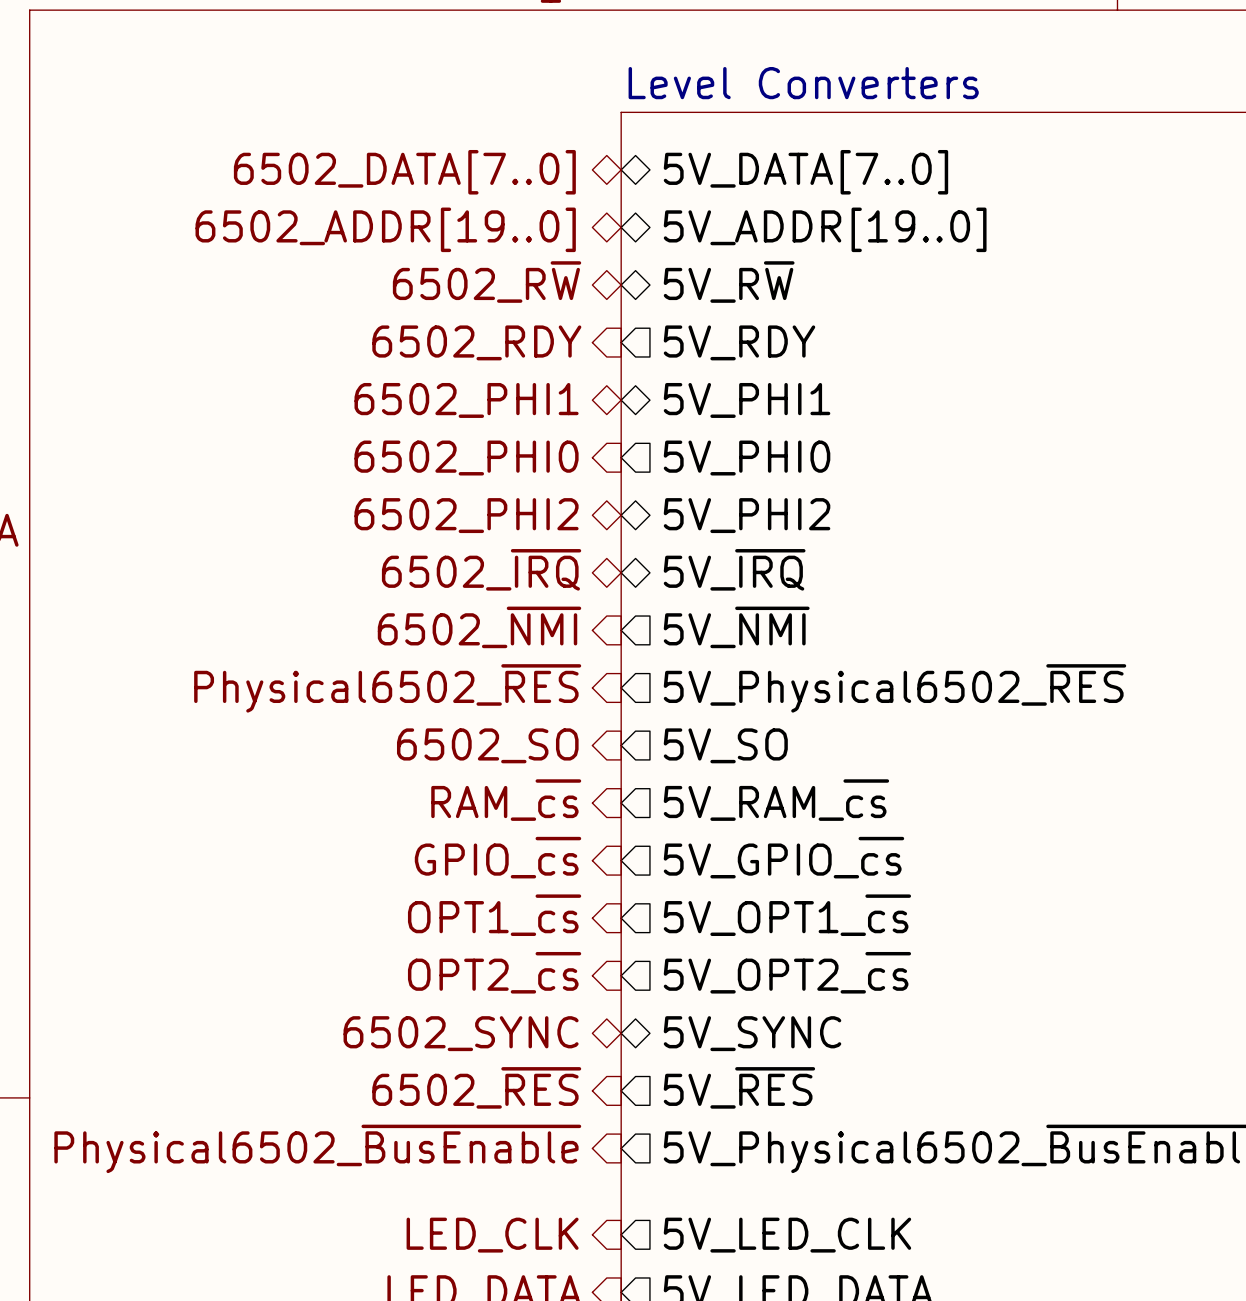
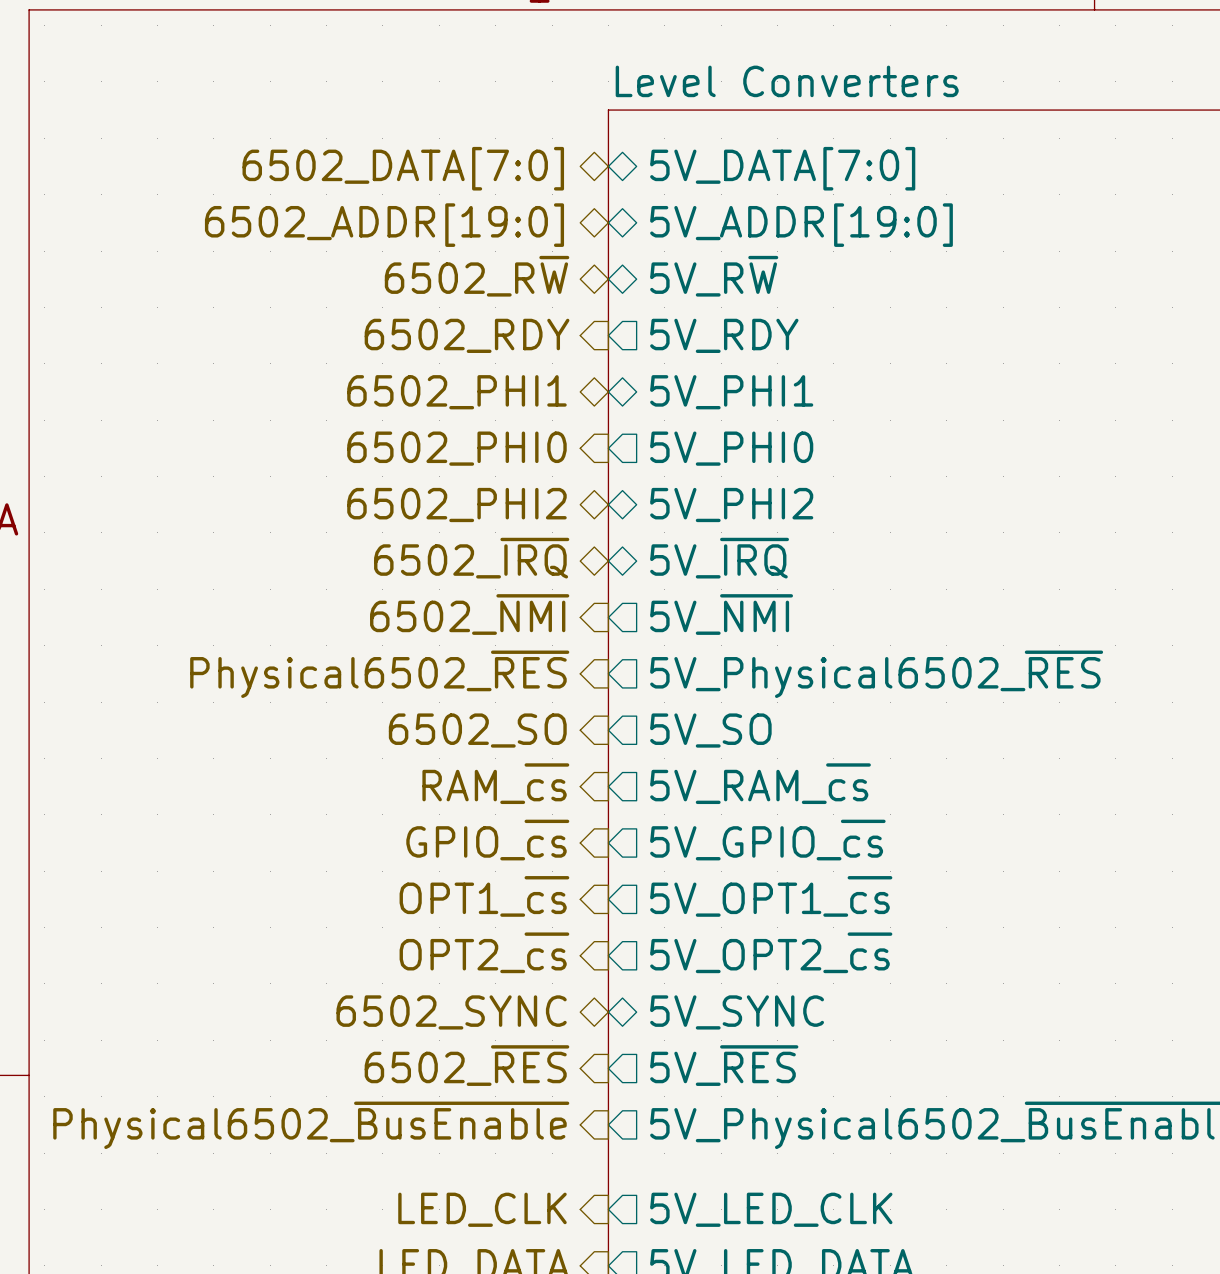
hierarchical label: 6502_DATA[7..0] (404, 172) -> 6502_DATA[7:0] (403, 168)
sheet pin: 5V_DATA[7..0] (805, 172) -> 5V_DATA[7:0] (782, 168)
hierarchical label: 6502_ADDR[19..0] (385, 229) -> 6502_ADDR[19:0] (384, 225)
sheet pin: 5V_ADDR[19..0] (825, 229) -> 5V_ADDR[19:0] (801, 225)

